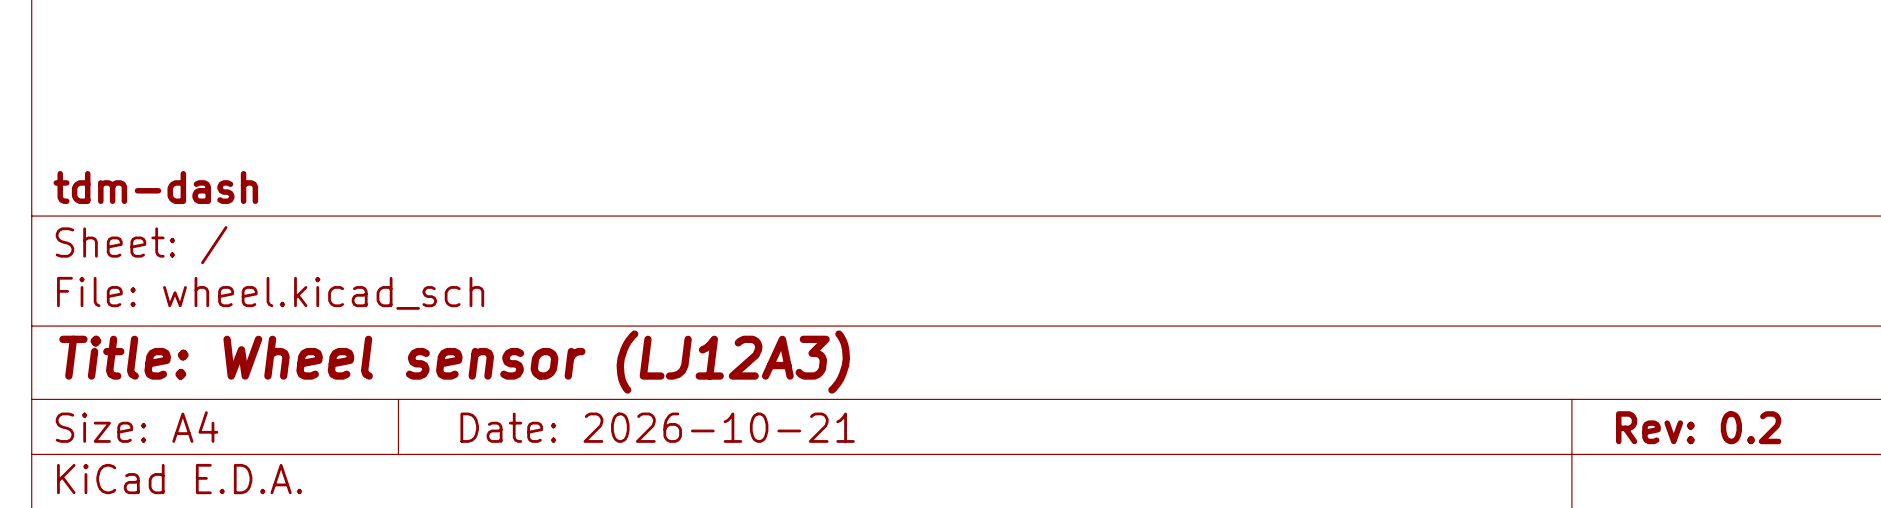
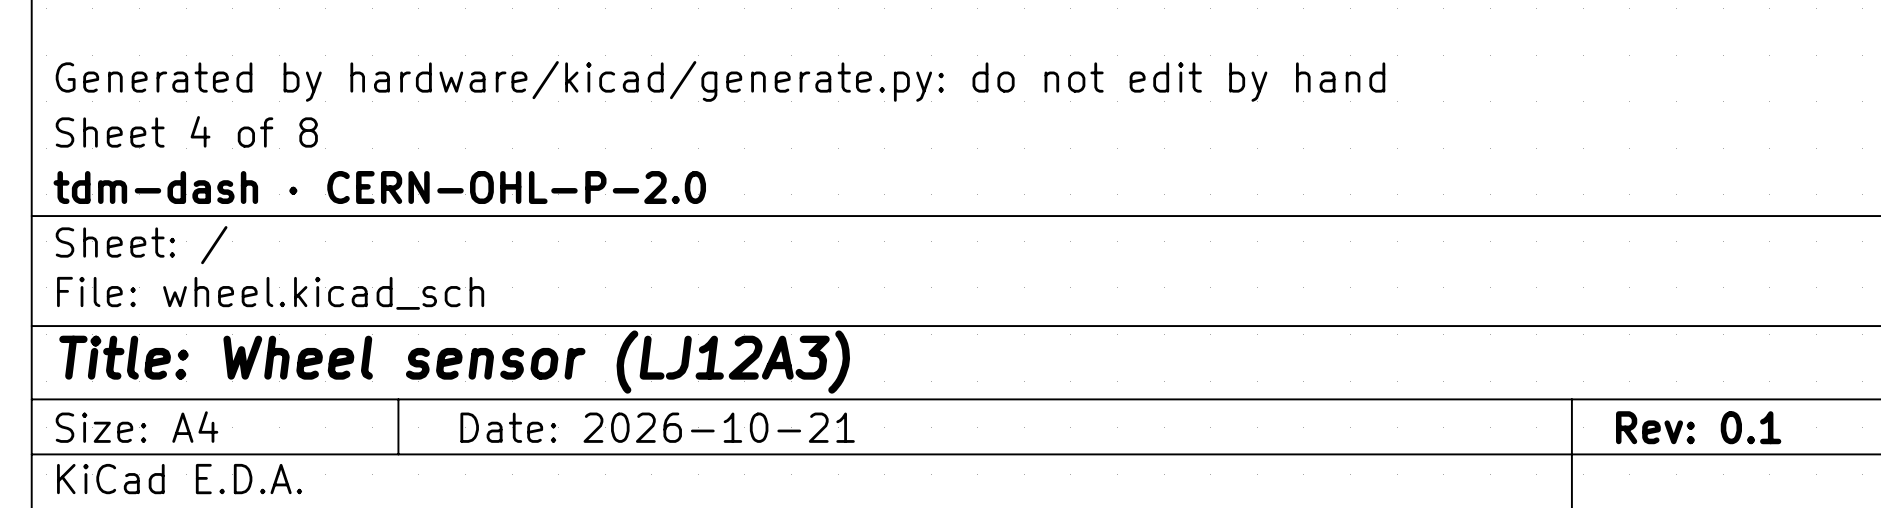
title block: none -> Generated by hardware/kicad/generate.py: do not edit by hand (720, 81)
title block: none -> Sheet 4 of 8 (186, 131)
title block: tdm-dash (155, 187) -> tdm-dash · CERN-OHL-P-2.0 (379, 187)
title block: Rev: 0.2 (1698, 427) -> Rev: 0.1 (1698, 427)

